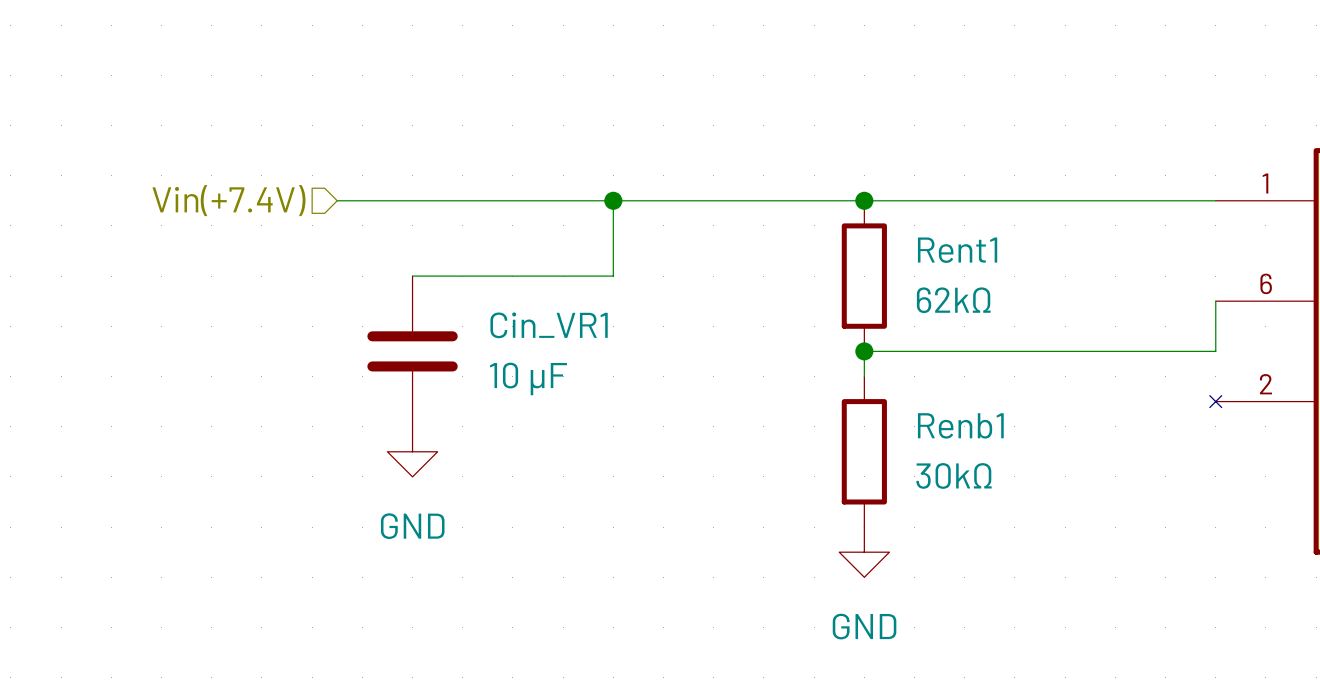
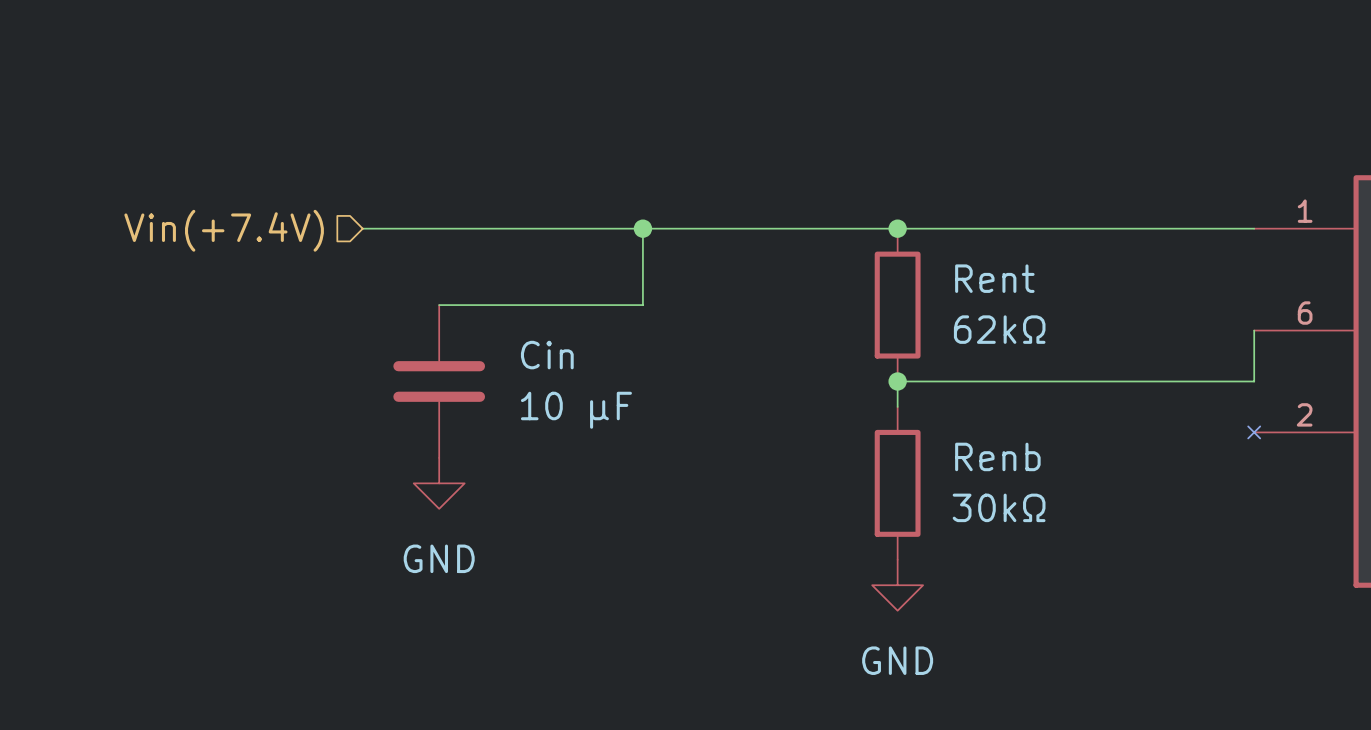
Rent1 name: Rent1 (957, 250) -> Rent (994, 278)
Cin_VR1 name: Cin_VR1 (549, 325) -> Cin (547, 355)
Renb1 name: Renb1 (960, 425) -> Renb (997, 456)

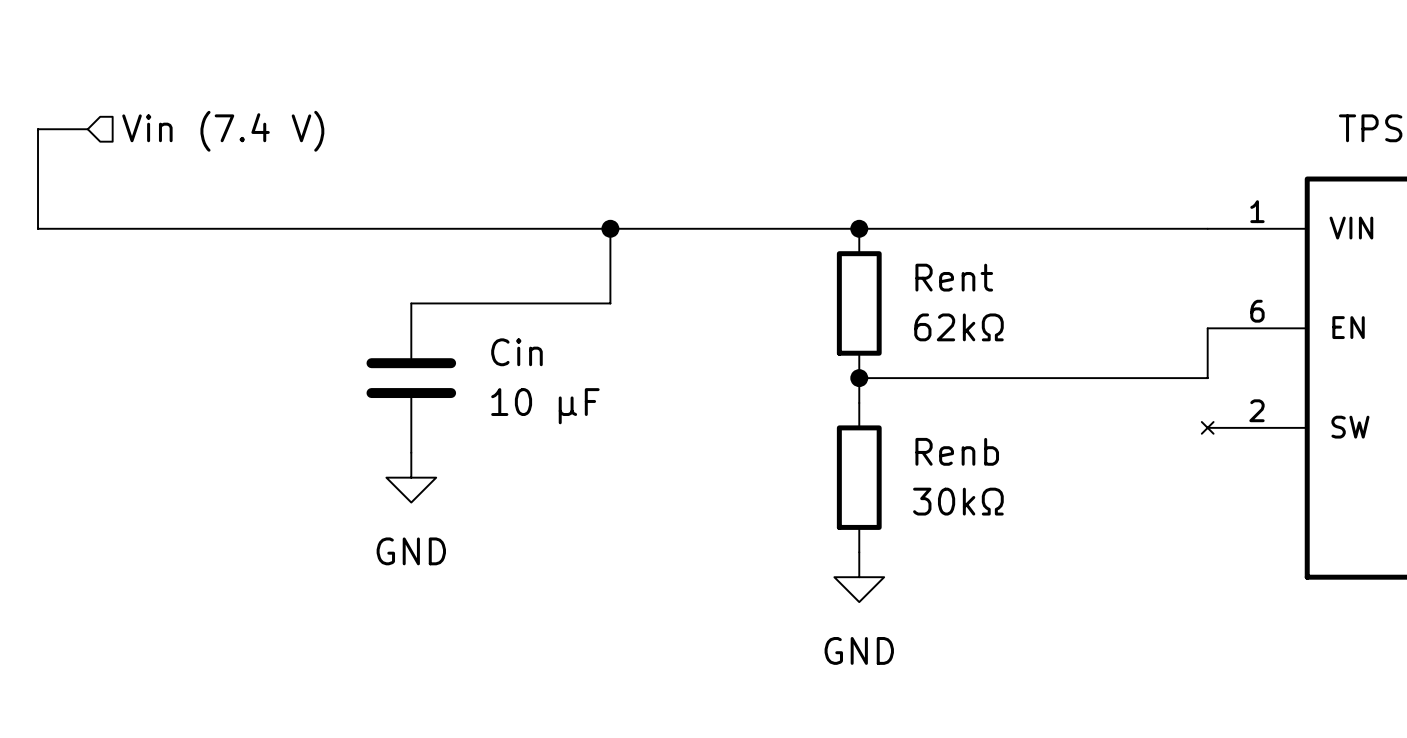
wire: none -> (87, 129) (38, 129) (38, 228) (336, 228)
hierarchical label: none -> Vin (7.4 V) (223, 131)
hierarchical label: Vin(+7.4V) (224, 230) -> none

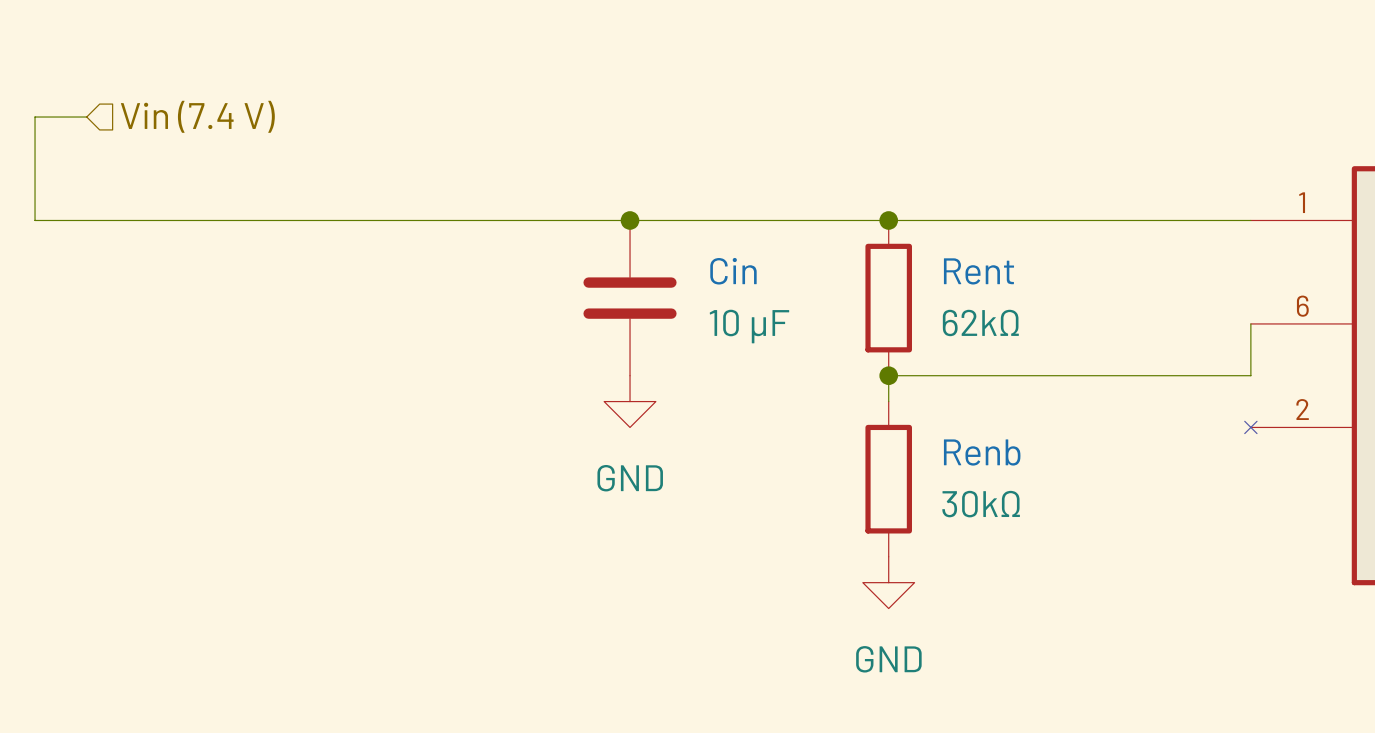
wire: (610, 228) (610, 303) (411, 303) -> none
Cin position: (411, 378) -> (630, 298)
power symbol position: GND (411, 477) -> GND (630, 401)

